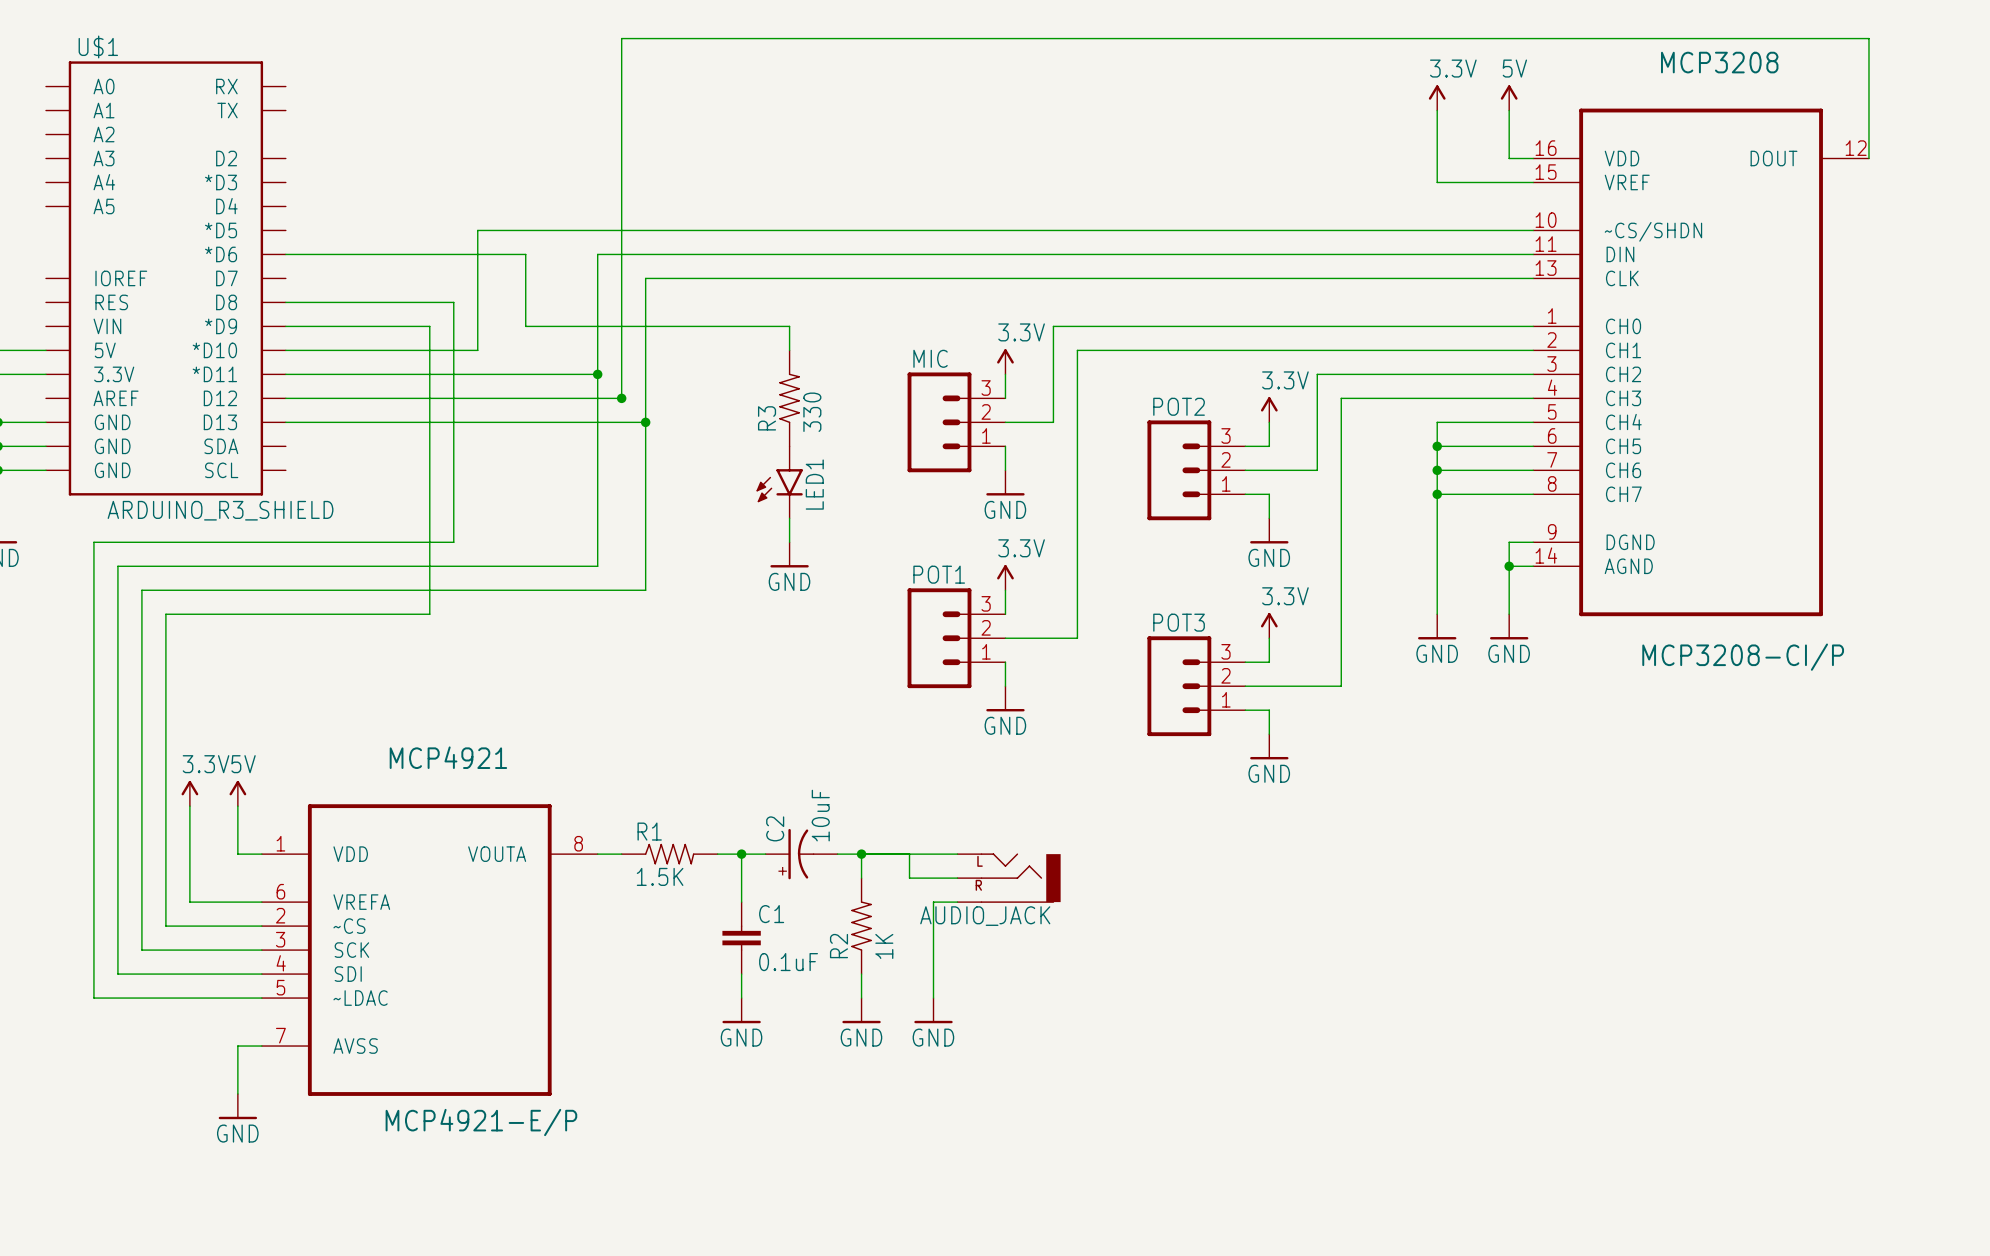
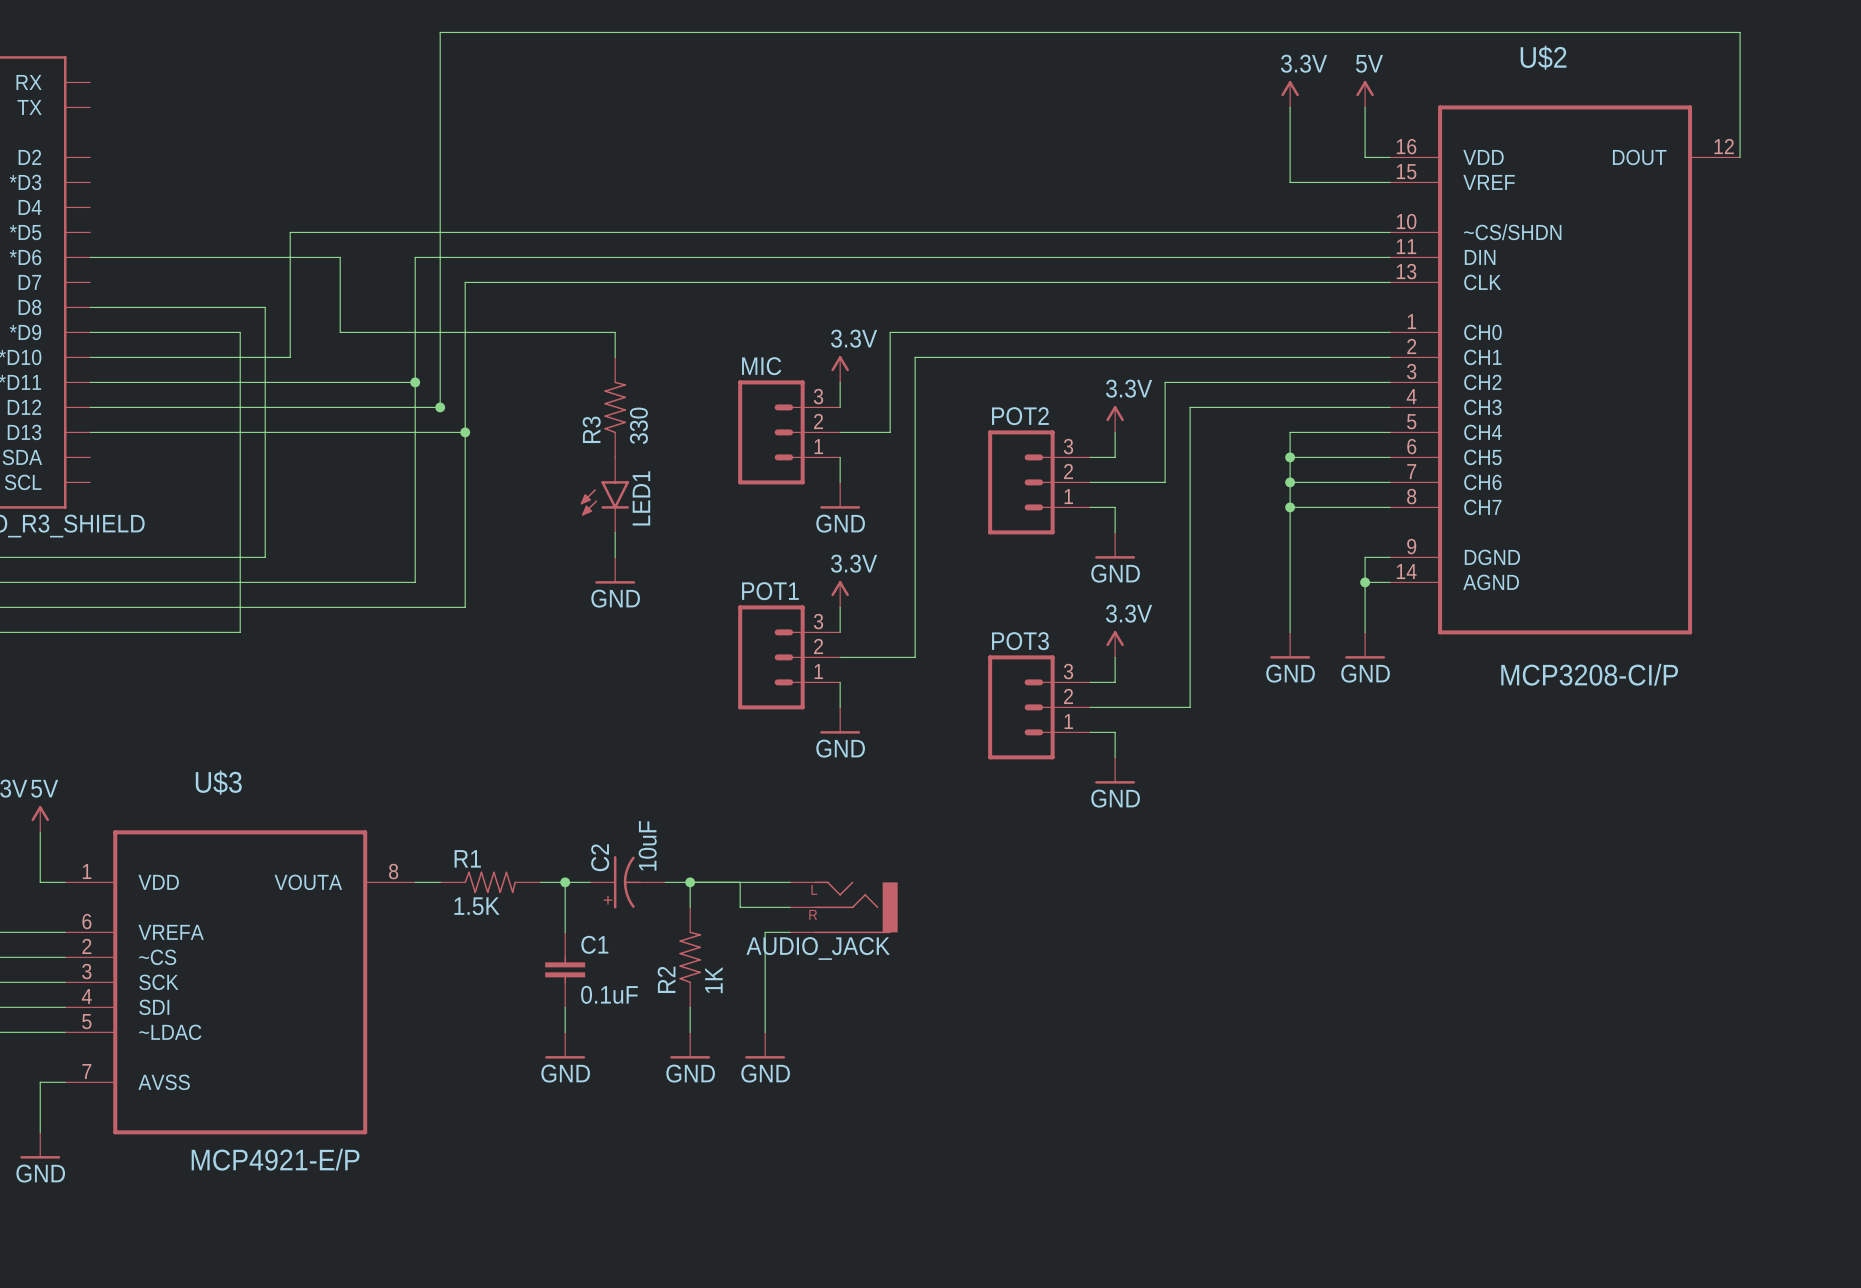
MCP3208 name: MCP3208 (1719, 62) -> U$2 (1543, 57)
MCP4921 name: MCP4921 (448, 757) -> U$3 (218, 782)

